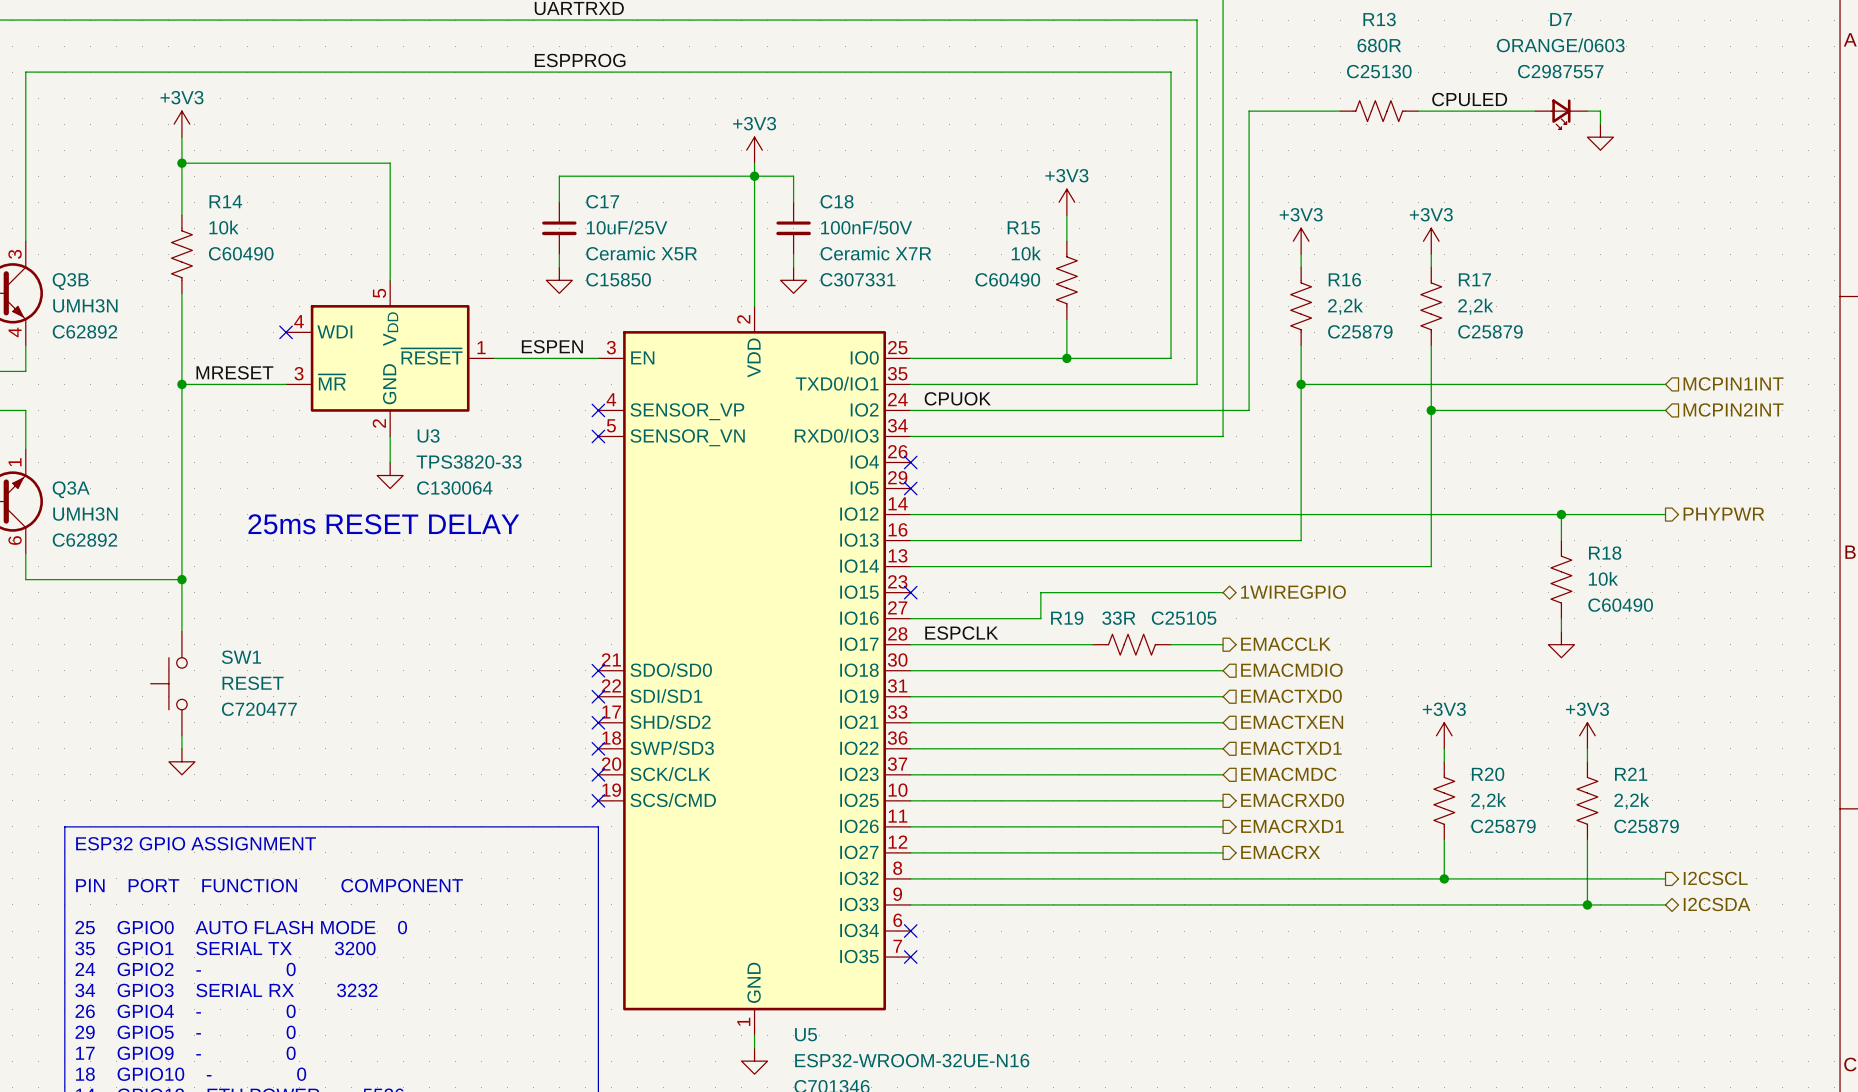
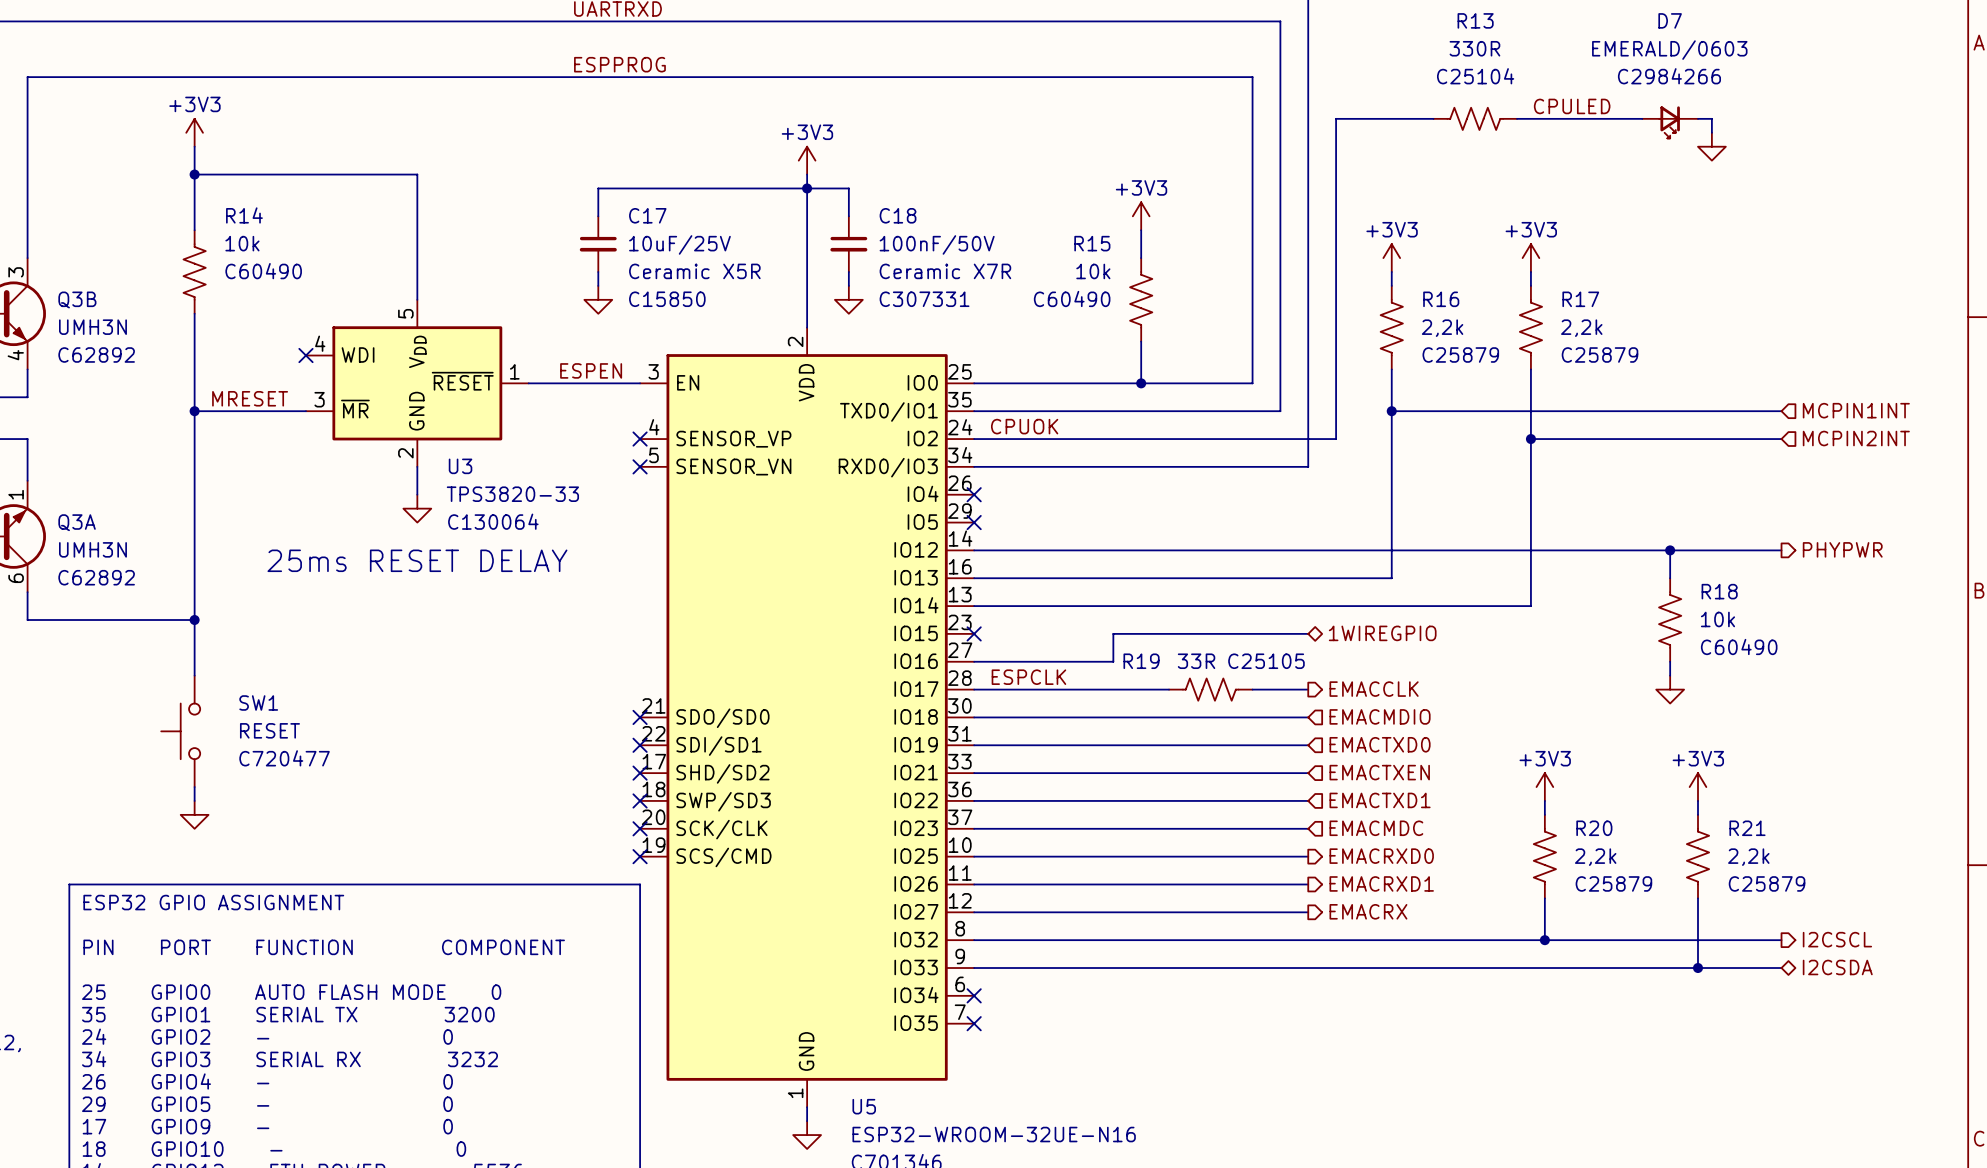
R13 value: 680R (1379, 45) -> 330R (1474, 48)
D7 value: ORANGE/0603 (1560, 45) -> EMERALD/0603 (1669, 50)
R13 text: C25130 (1379, 71) -> C25104 (1475, 76)
D7 text: C2987557 (1560, 71) -> C2984266 (1669, 76)

